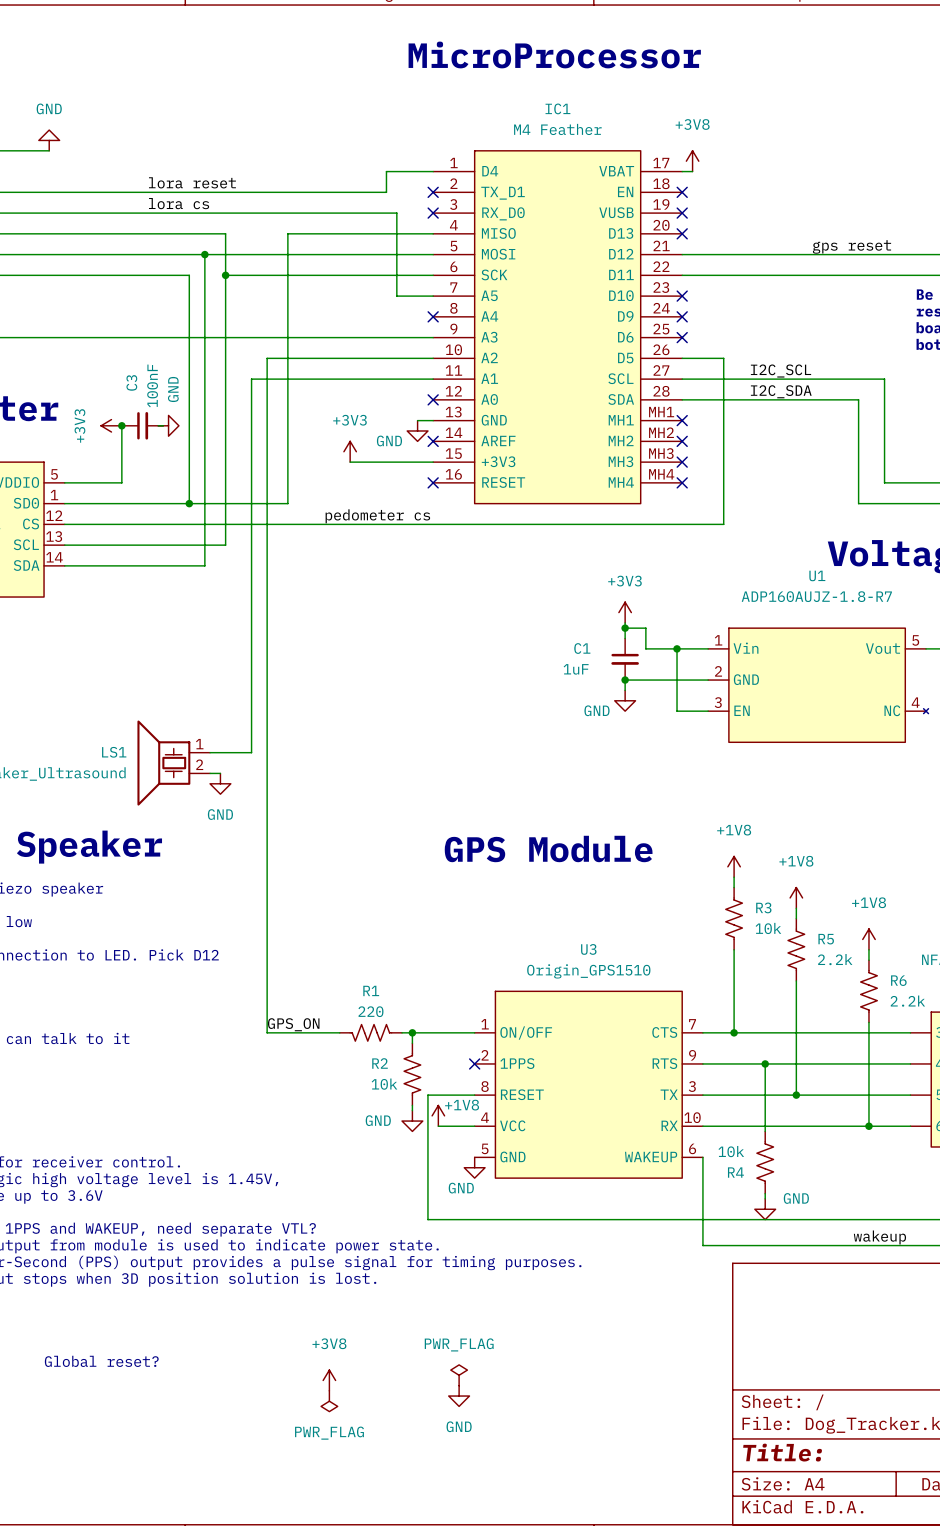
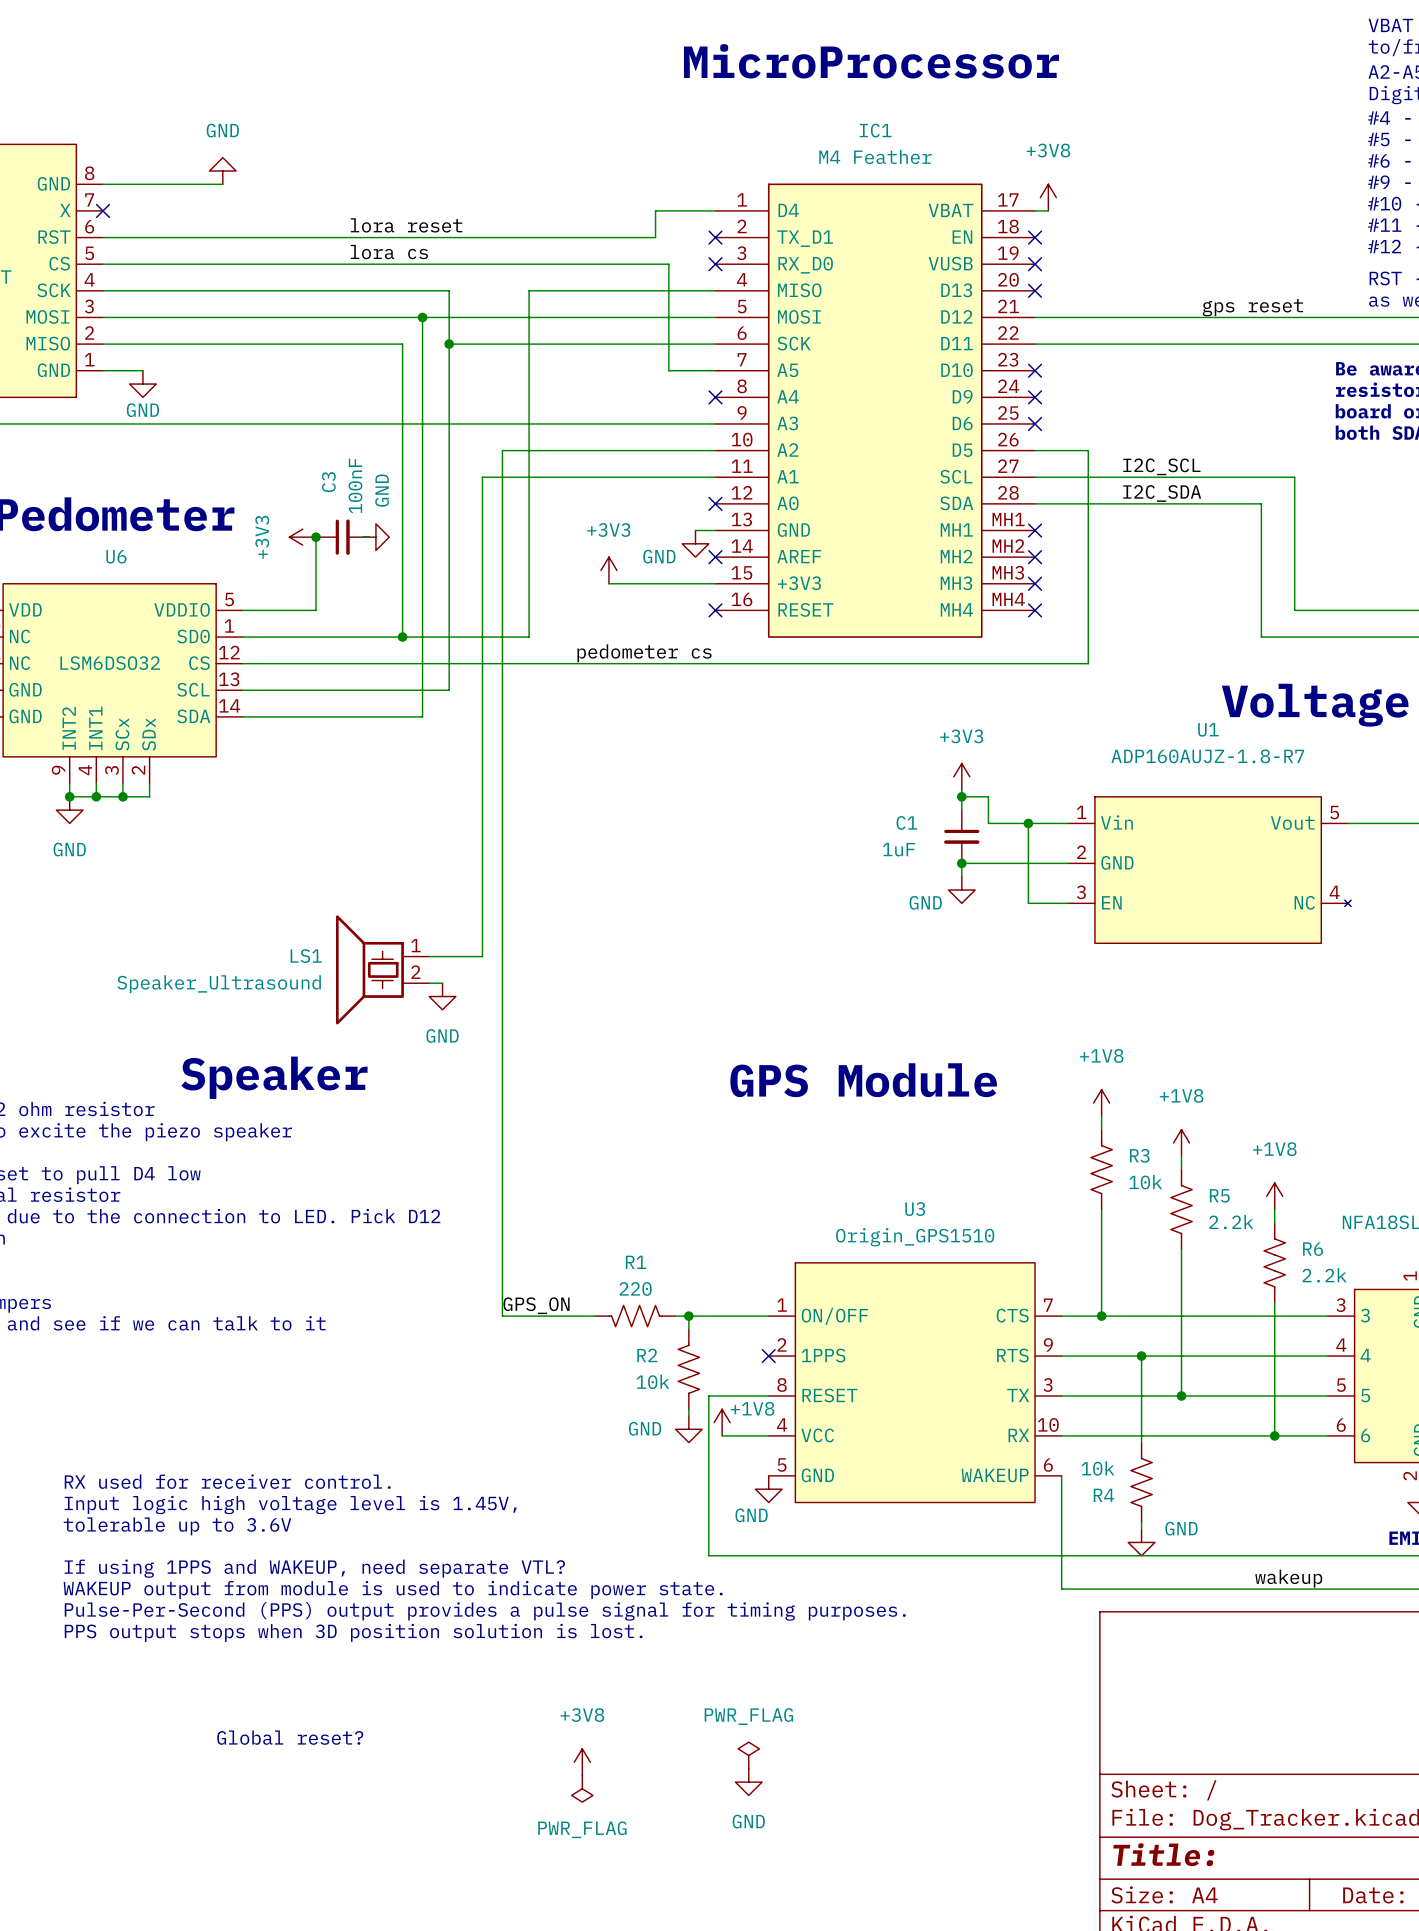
part pin number: none -> 3 (1340, 1305)
part pin number: none -> 4 (1341, 1345)
part pin number: none -> 5 (1341, 1385)
part pin number: none -> 6 (1341, 1425)

